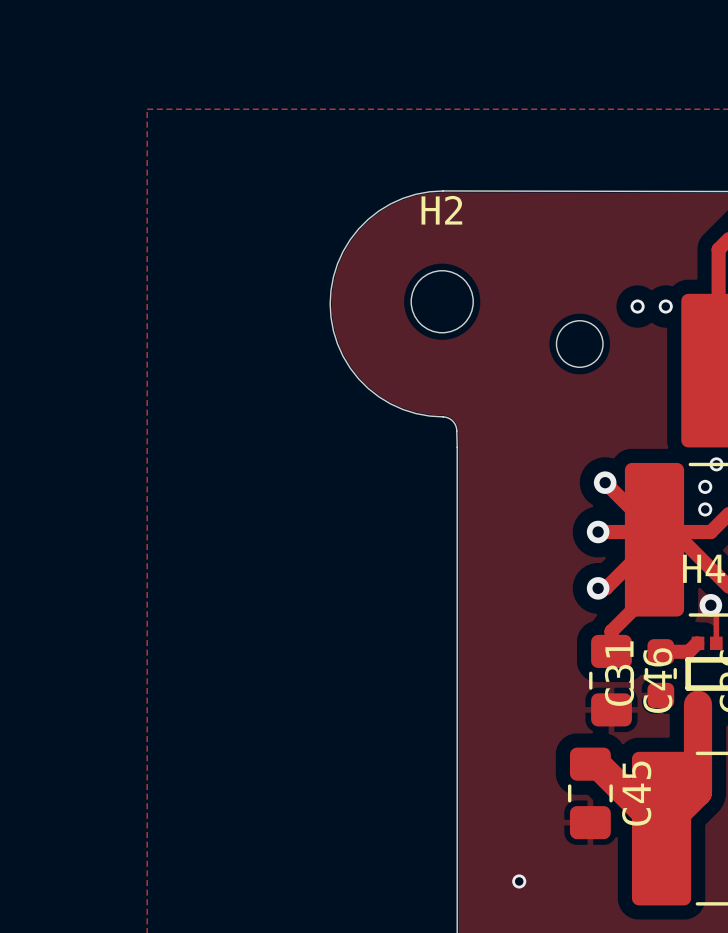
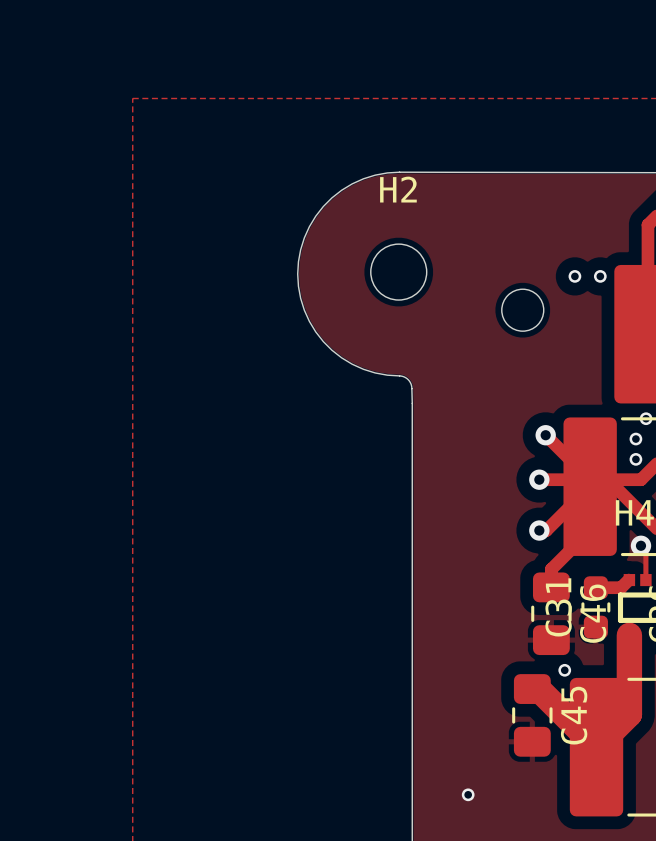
via: none -> (564, 670)

